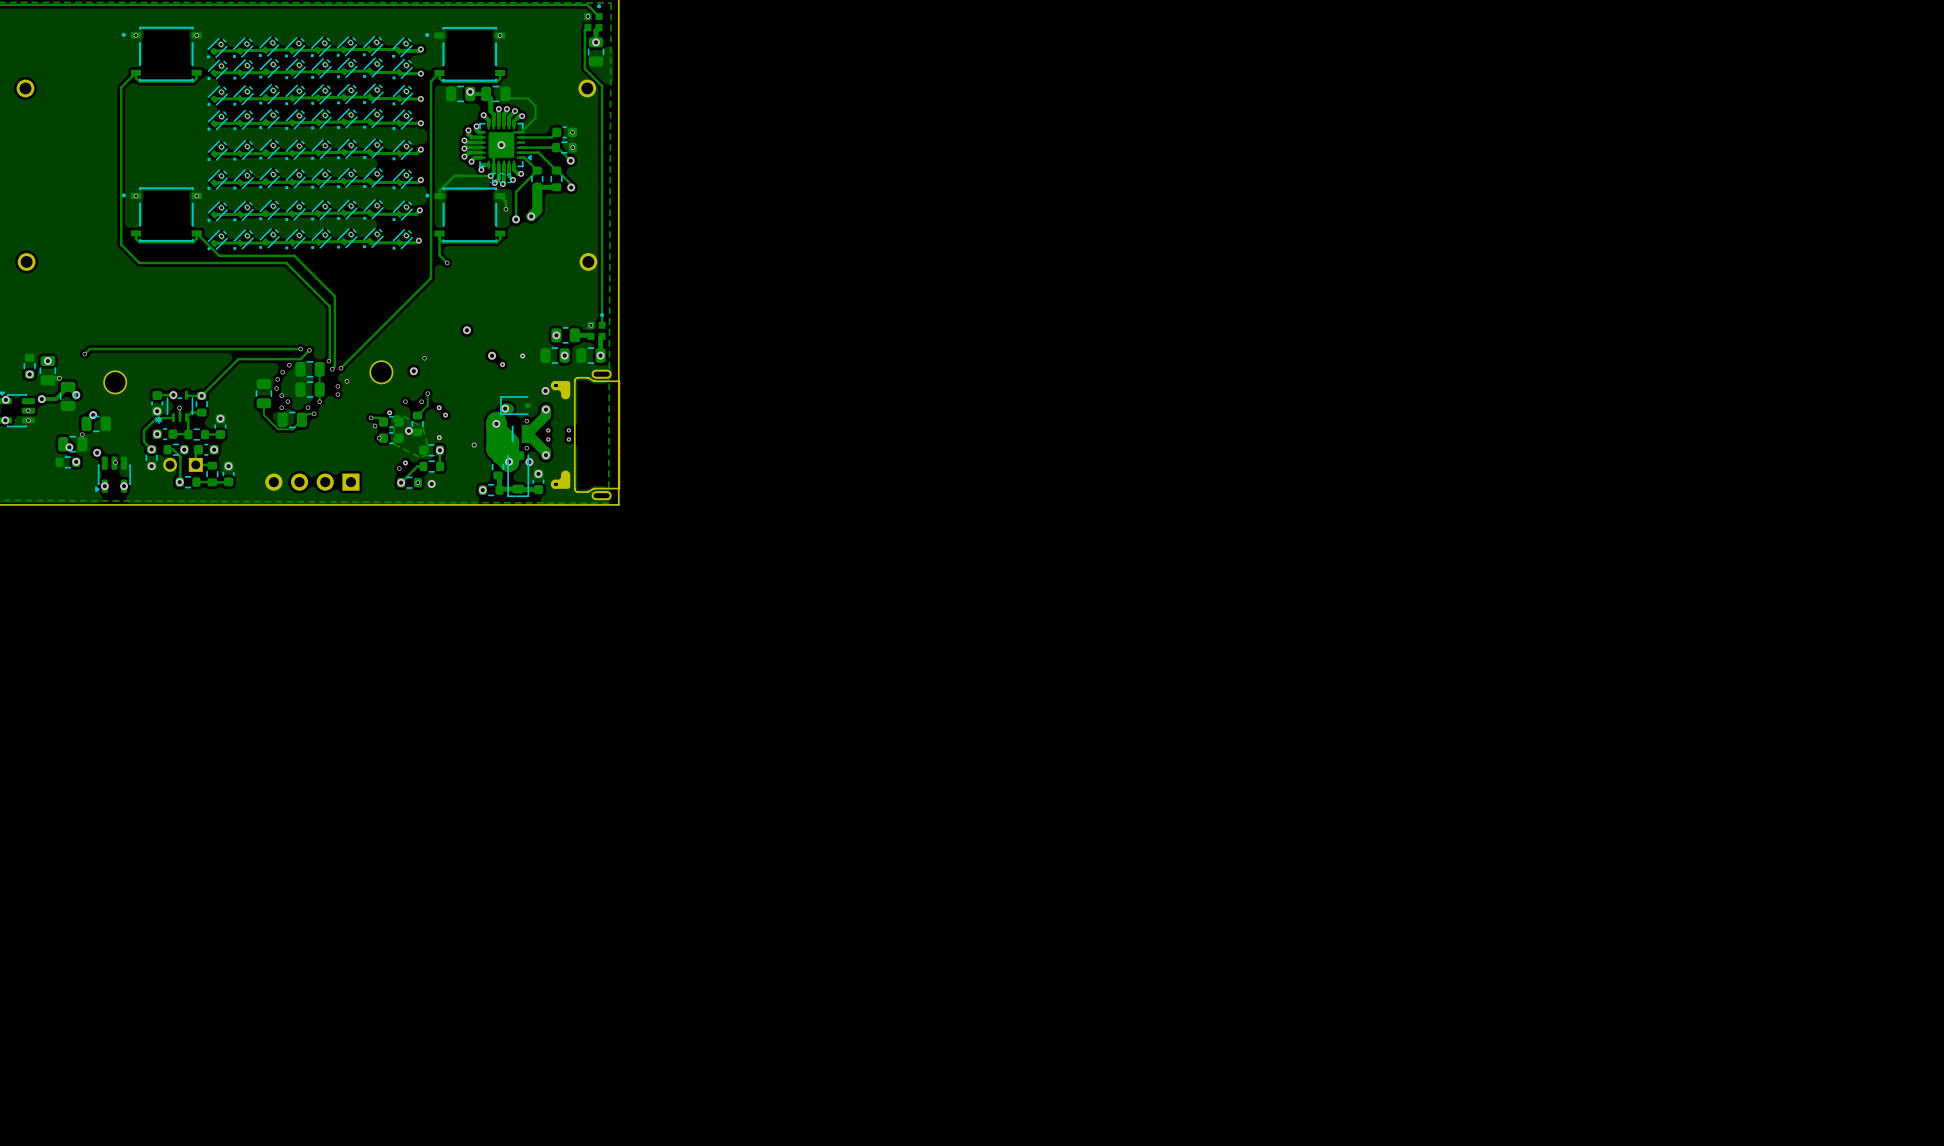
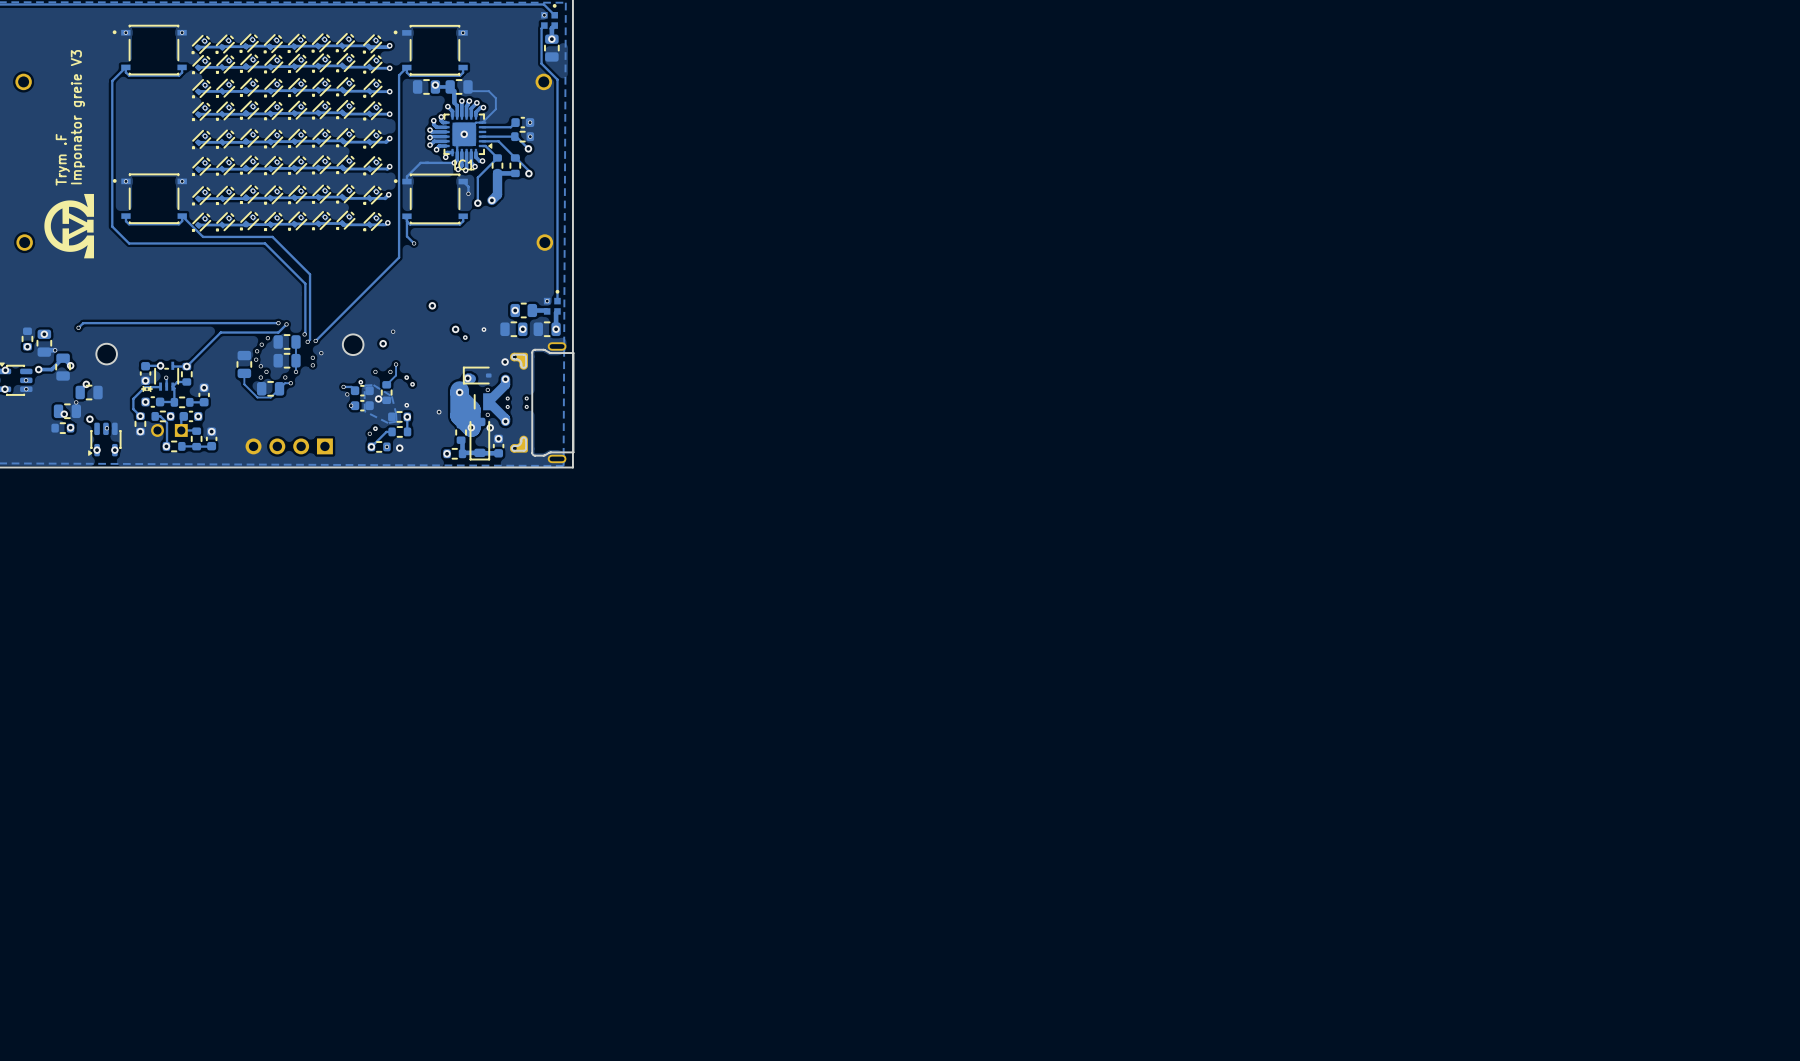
text: none -> Imponator greie V3 (77, 117)
text: none -> Trym .F (62, 159)
drawing: none -> [44, 193, 95, 259]

